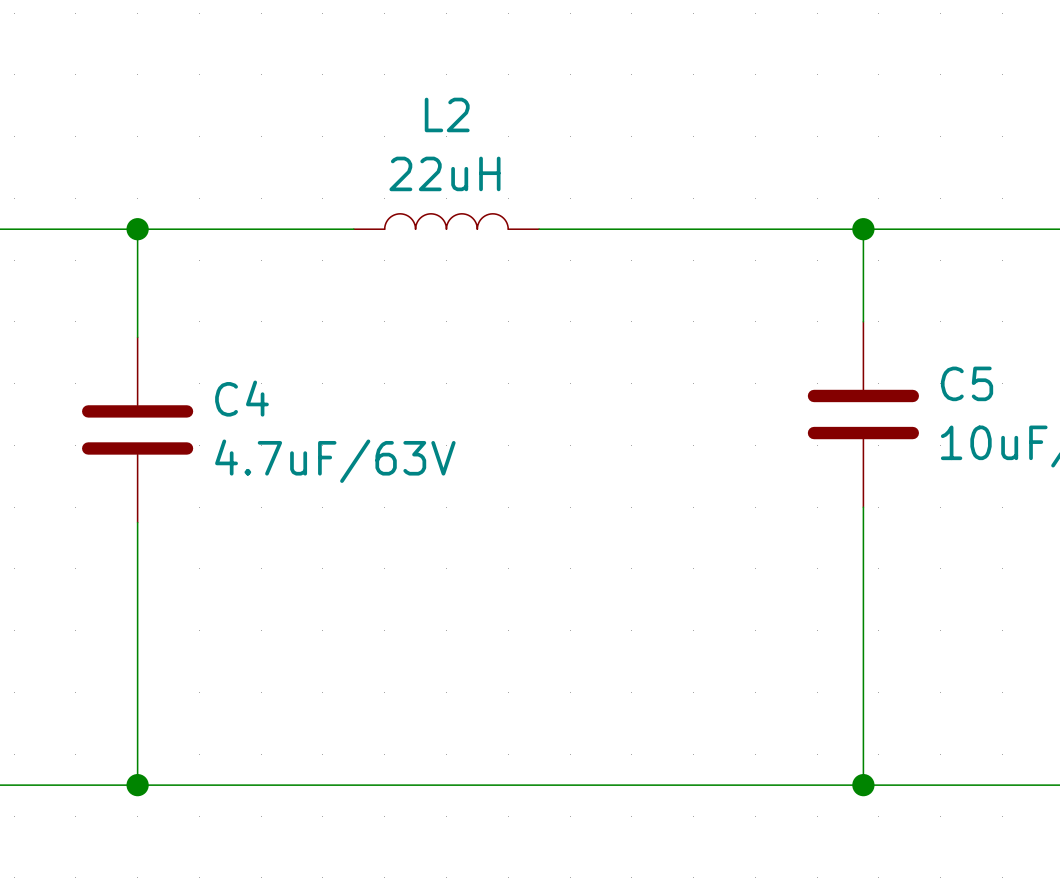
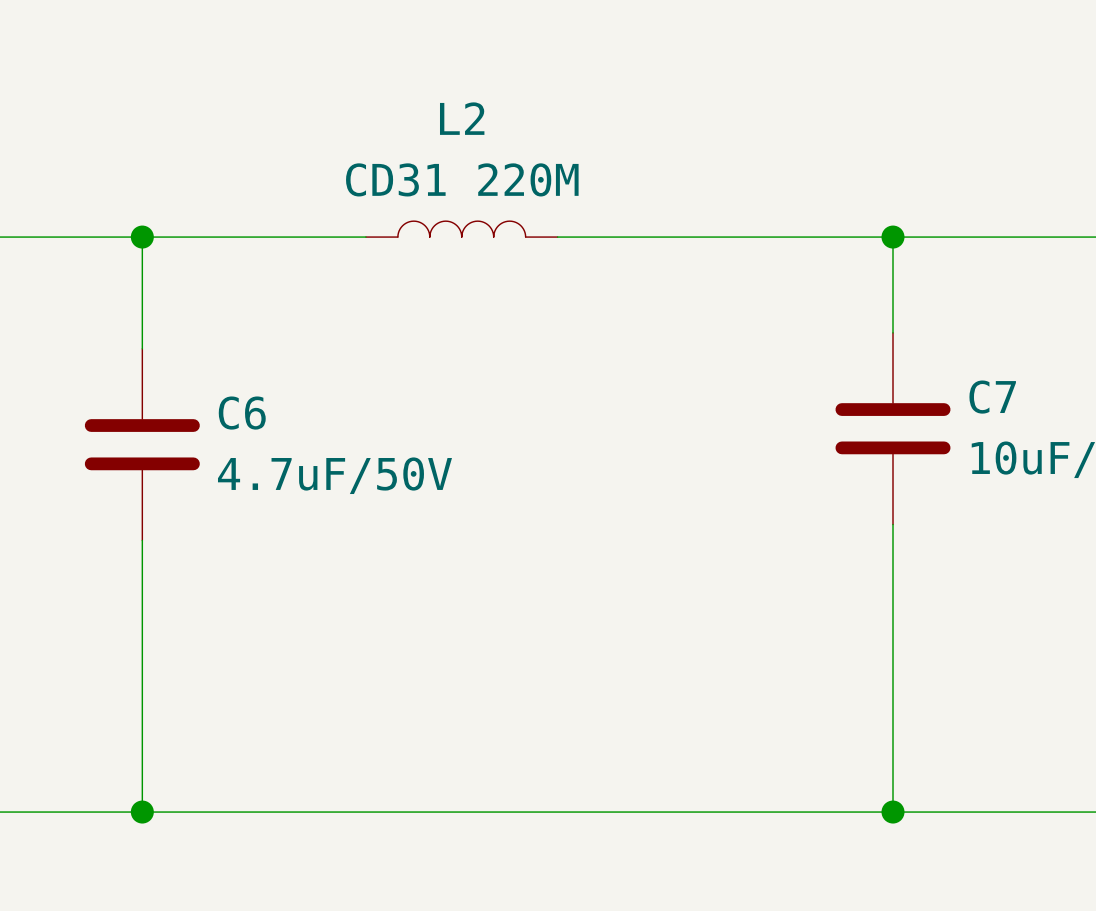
L2 value: 22uH (444, 173) -> CD31 220M (462, 179)
C5 name: C5 (967, 383) -> C7 (992, 397)
C4 name: C4 (241, 398) -> C6 (242, 413)
C4 value: 4.7uF/63V (335, 461) -> 4.7uF/50V (334, 475)

